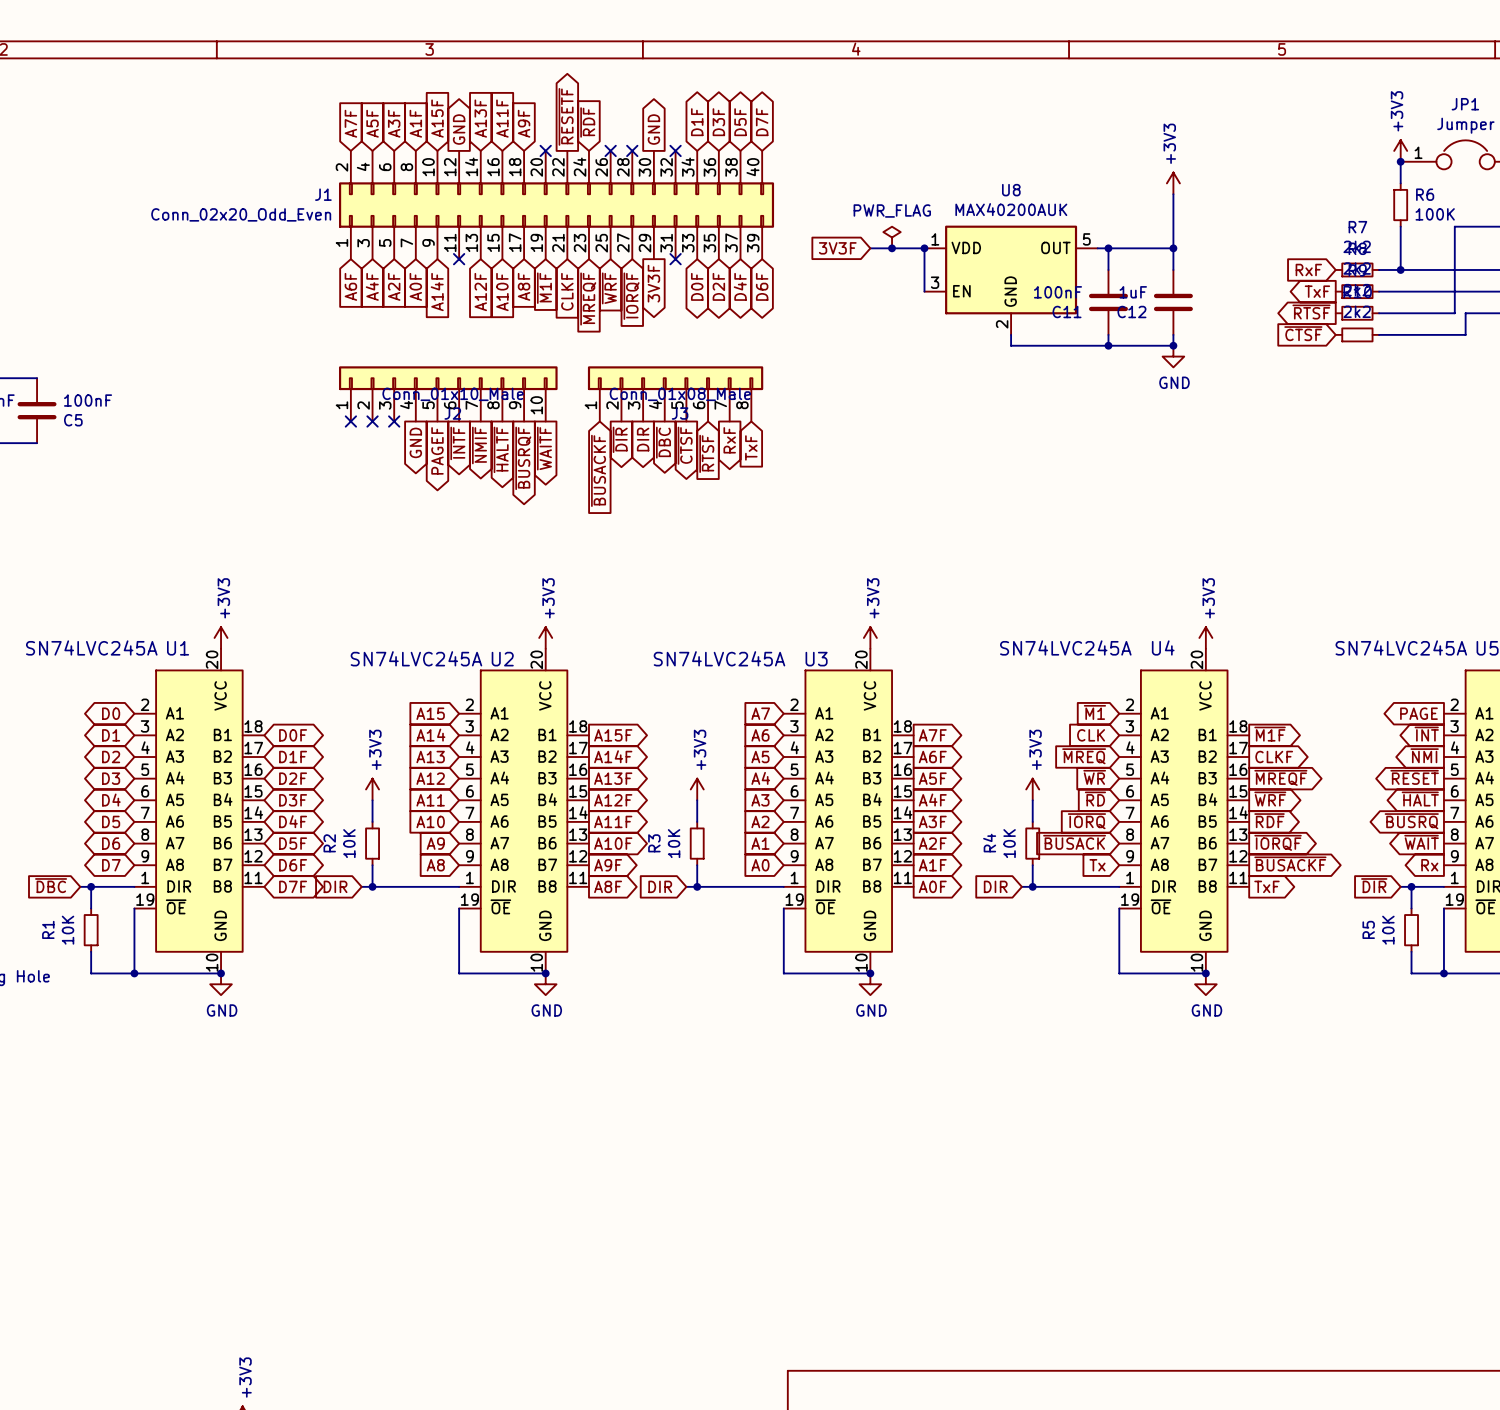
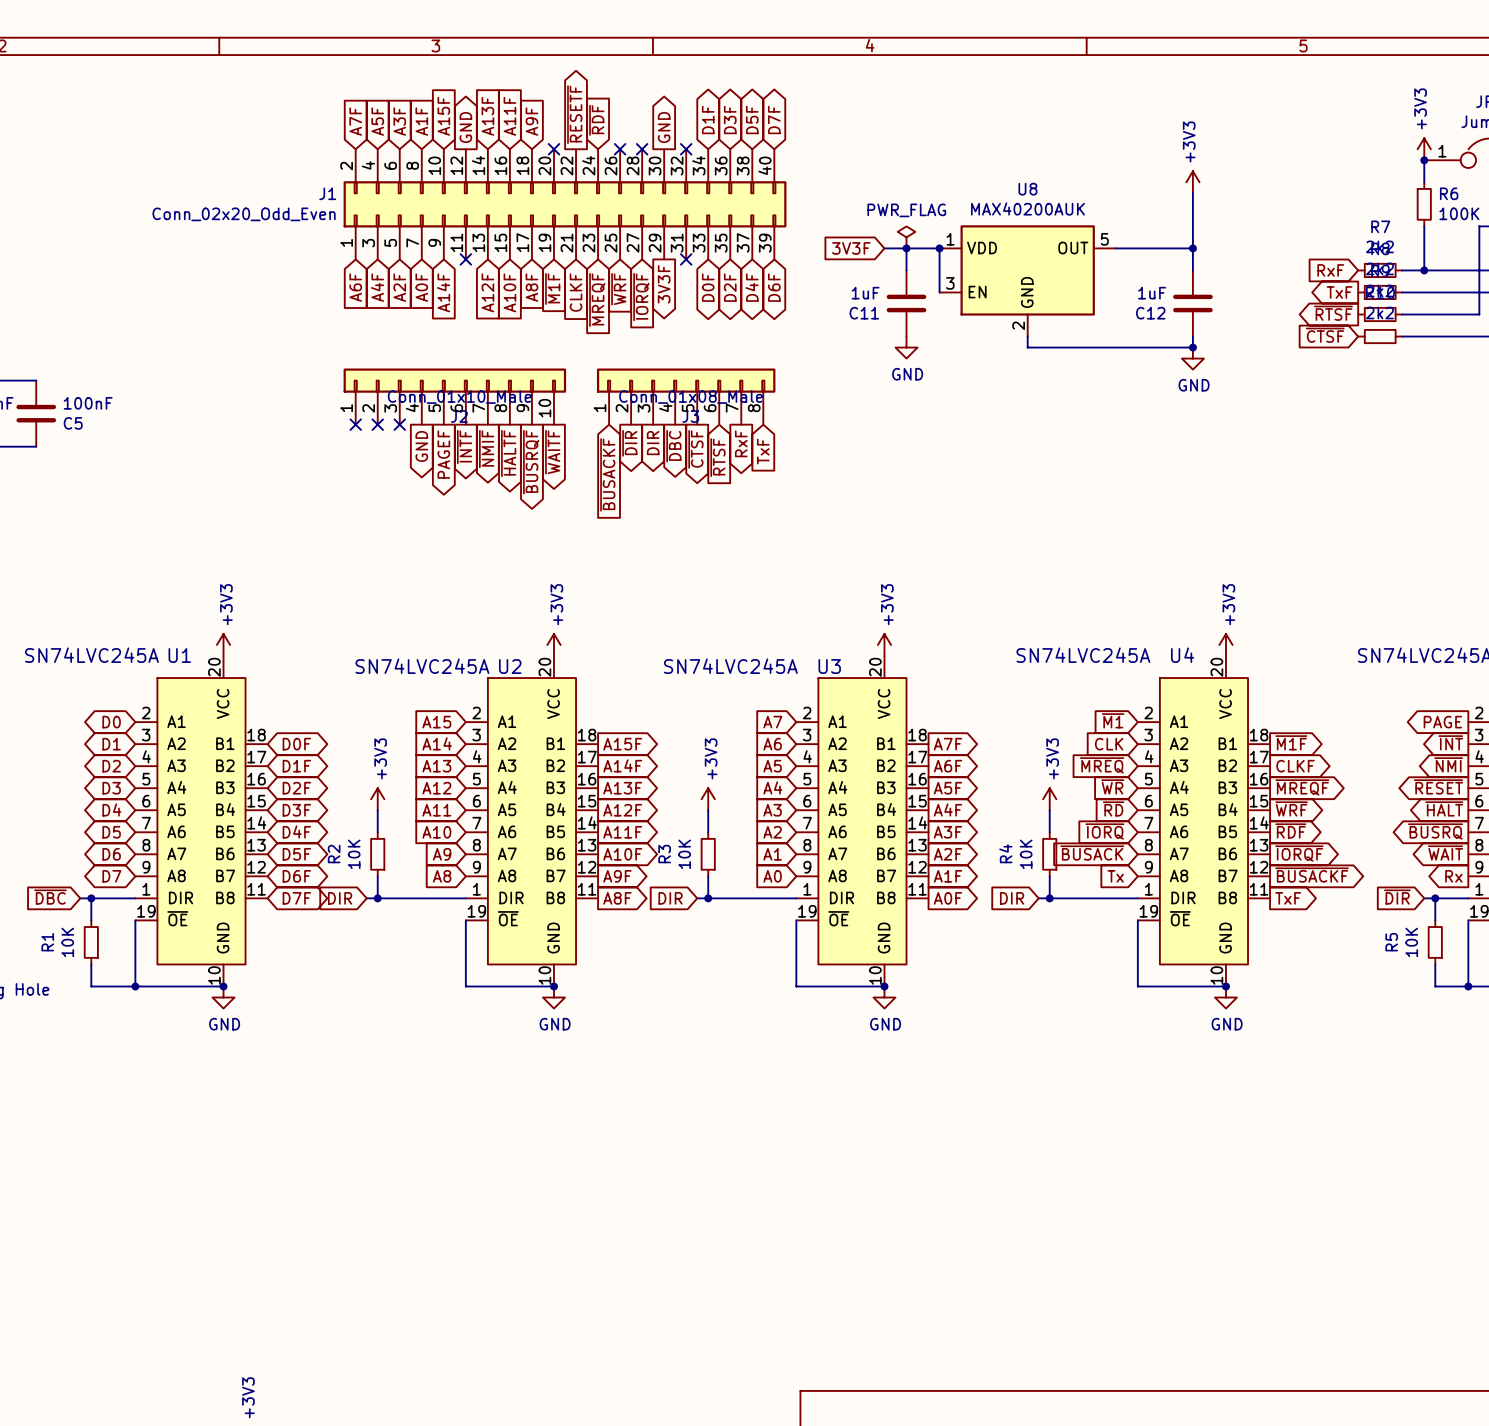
wire: none -> (906, 248) (906, 270)
wire: (1108, 248) (1108, 269) -> none
junction: (1108, 248) -> none
C11 value: 100nF (1057, 292) -> 1uF (865, 293)
C11 position: (1108, 302) -> (906, 303)
wire: (1108, 334) (1108, 345) -> none
power symbol: none -> GND (906, 347)
junction: (1108, 345) -> none

